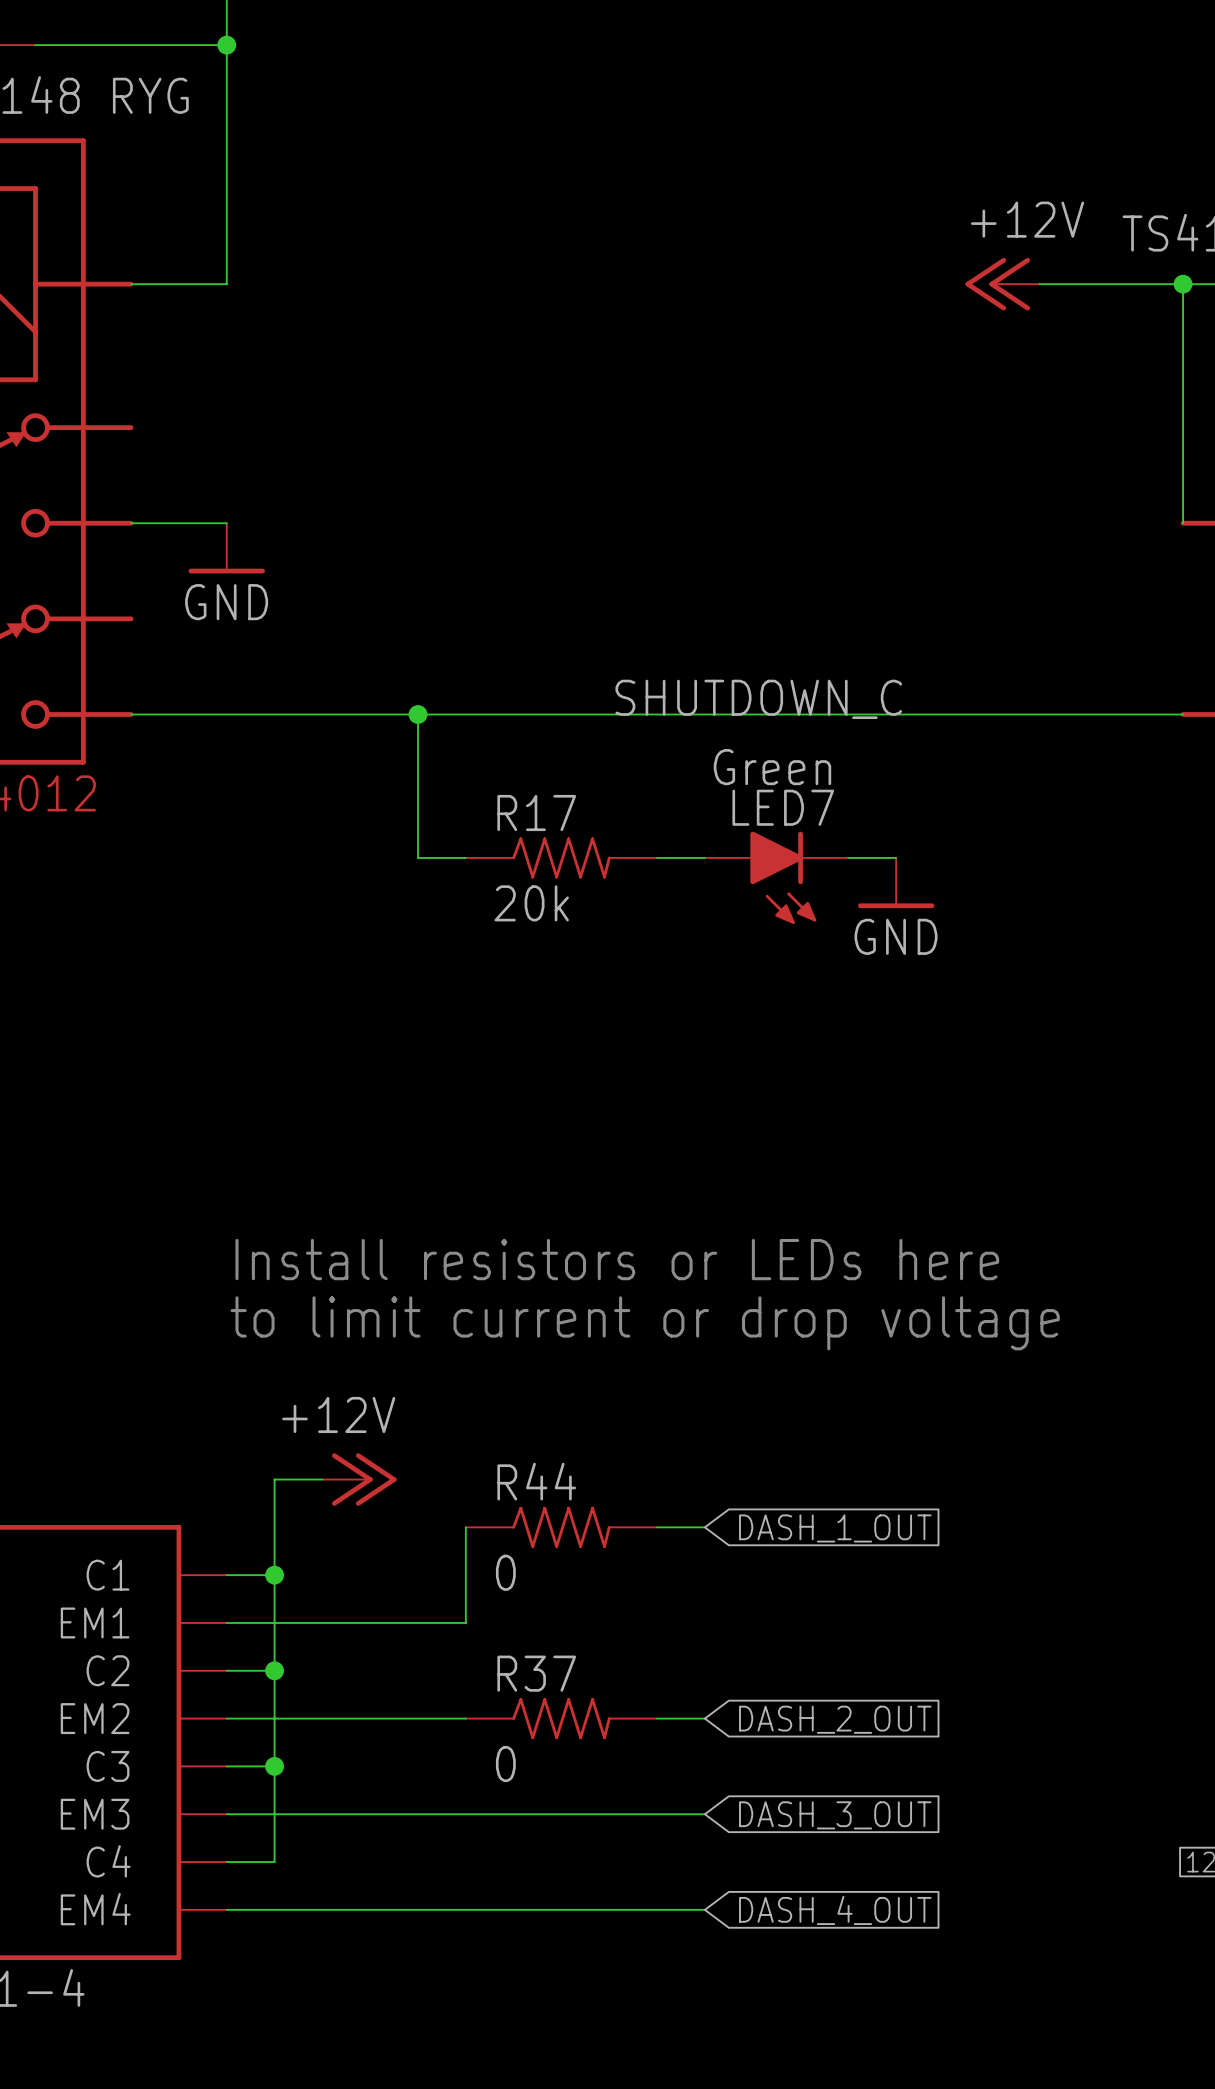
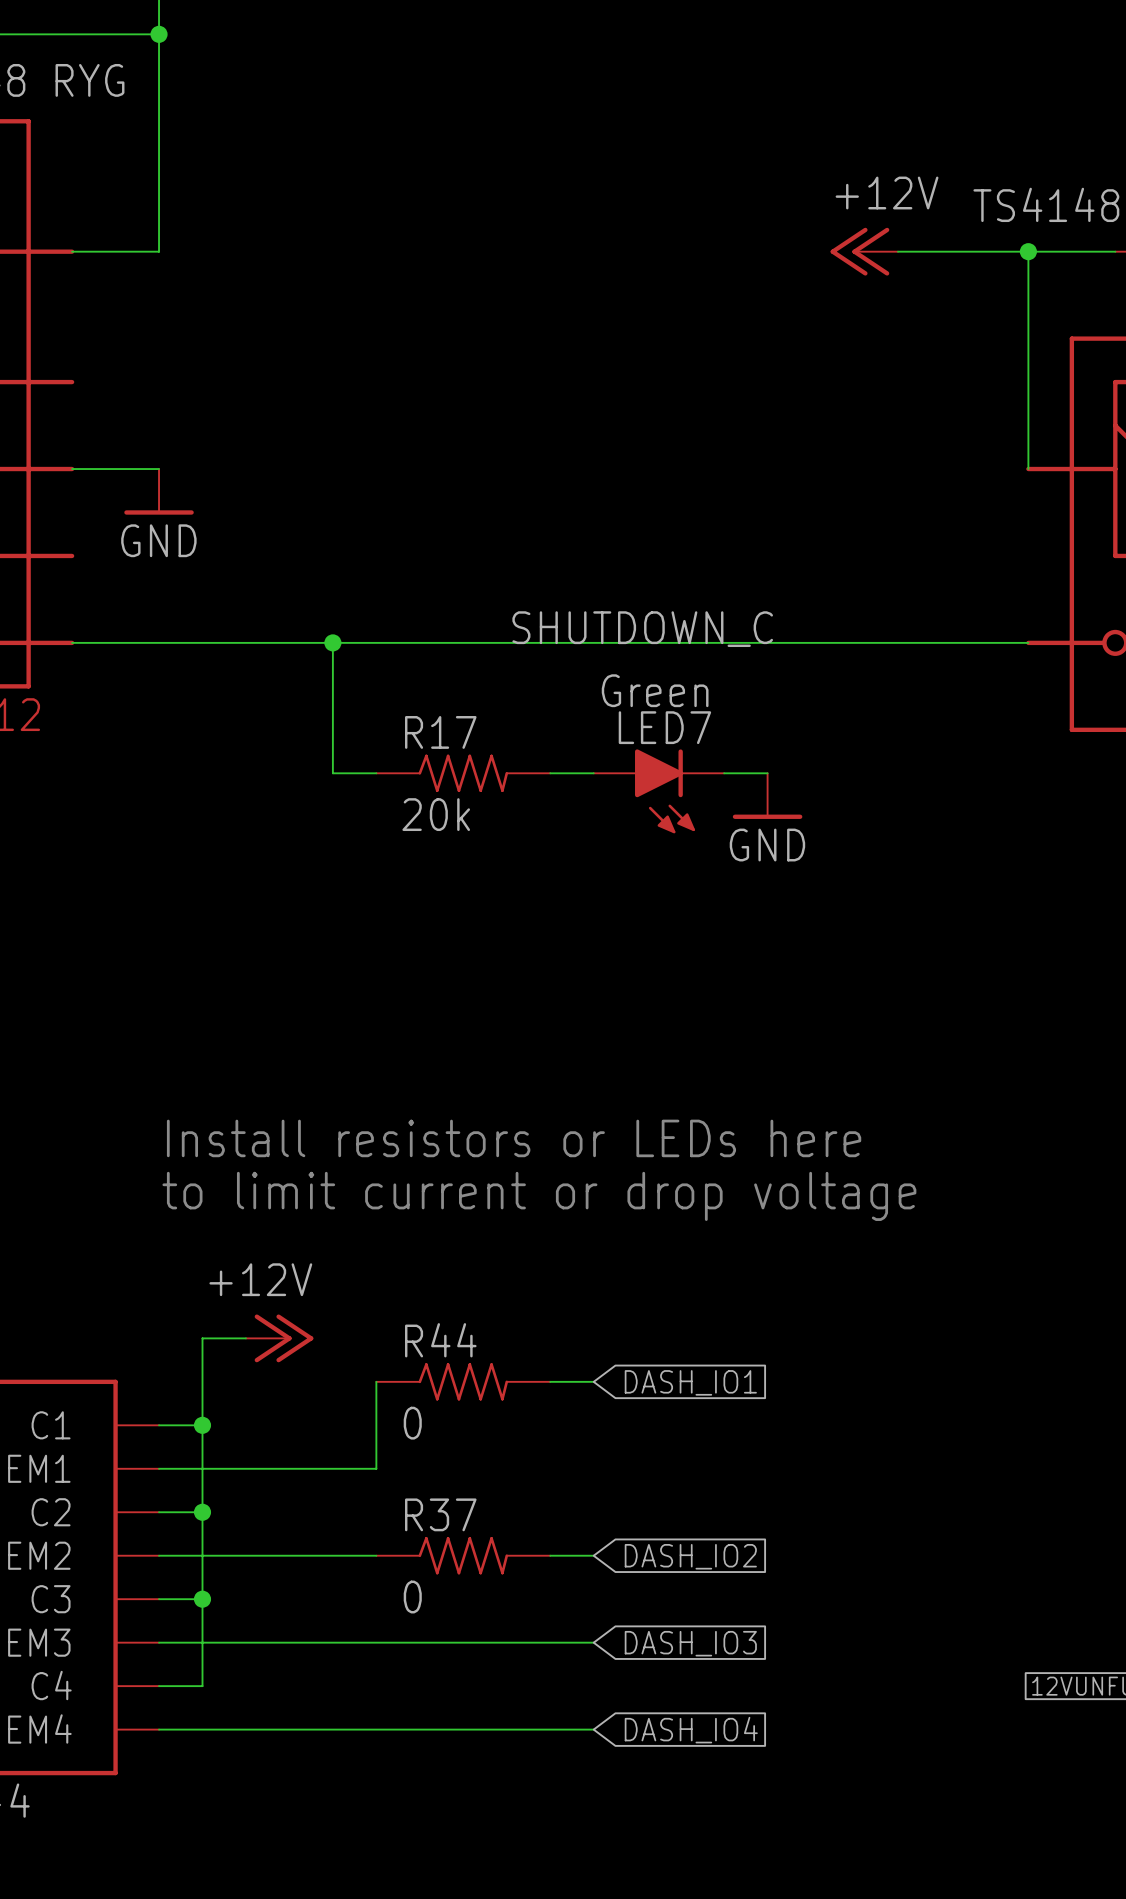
global label: DASH_1_OUT (835, 1528) -> DASH_IO1 (690, 1382)
global label: DASH_2_OUT (835, 1719) -> DASH_IO2 (690, 1556)
global label: DASH_3_OUT (835, 1815) -> DASH_IO3 (690, 1643)
global label: DASH_4_OUT (835, 1910) -> DASH_IO4 (691, 1730)

